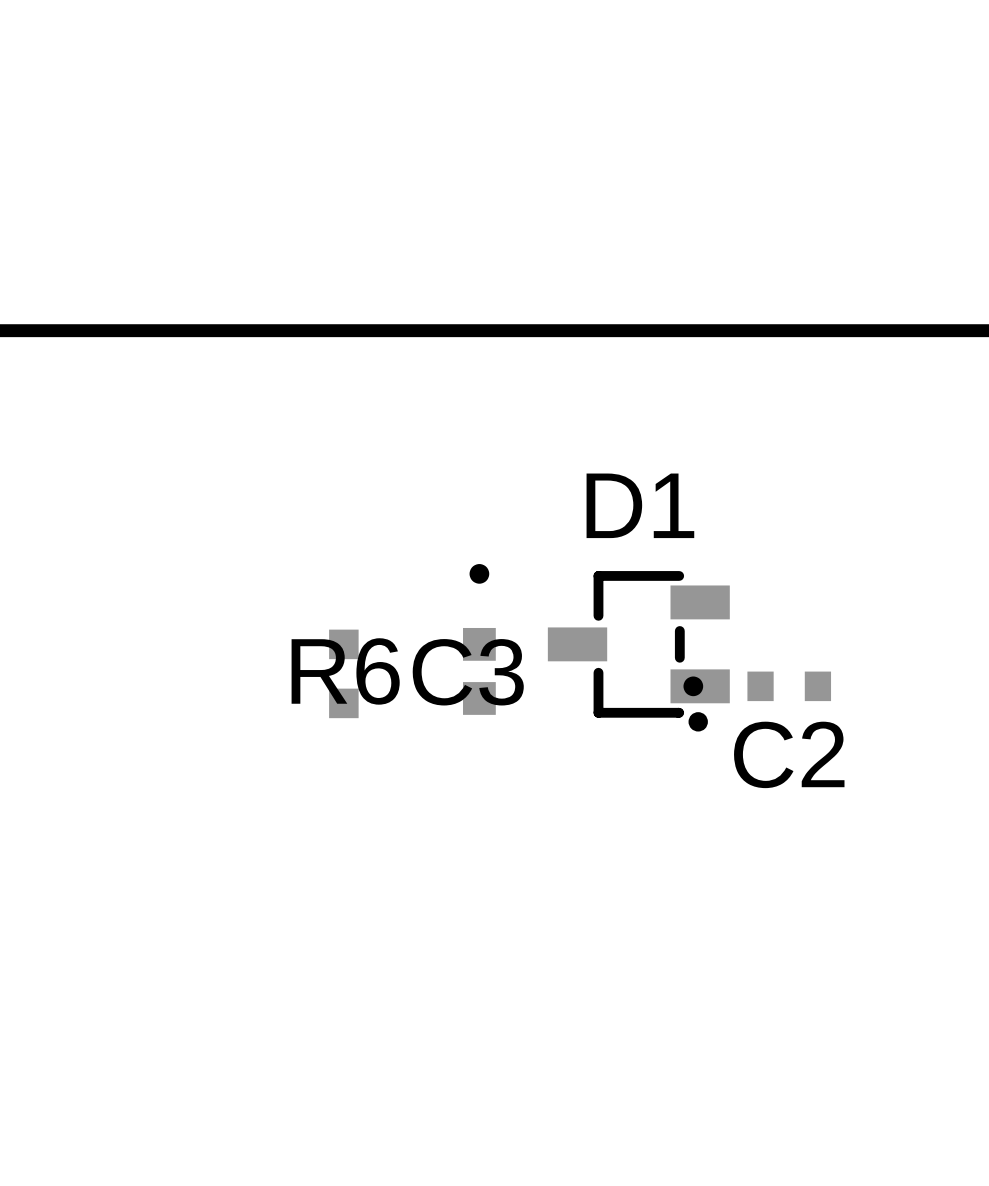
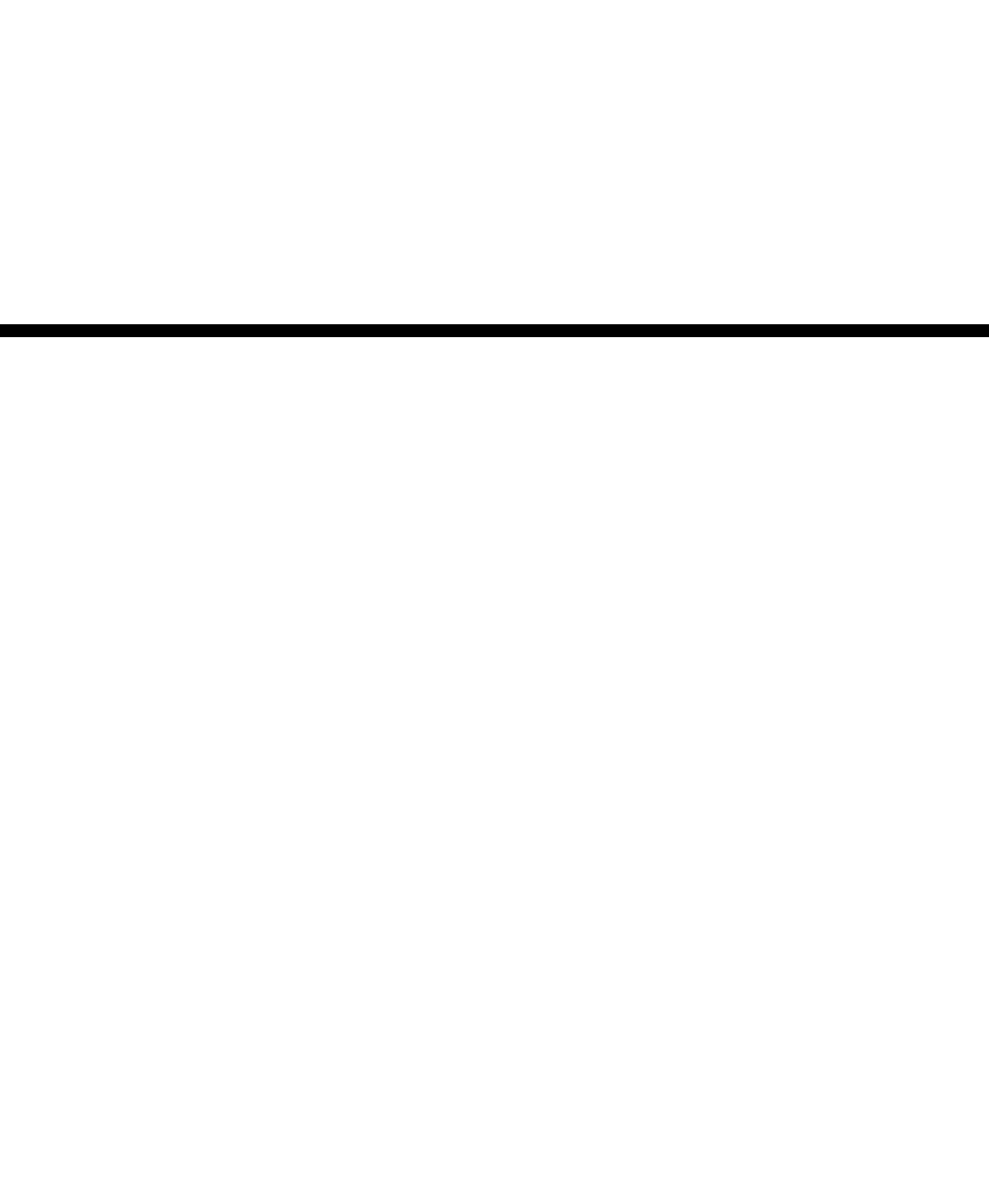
C3: (479, 639) -> none
D1: (638, 651) -> none
R6: (343, 673) -> none
C2: (757, 686) -> none

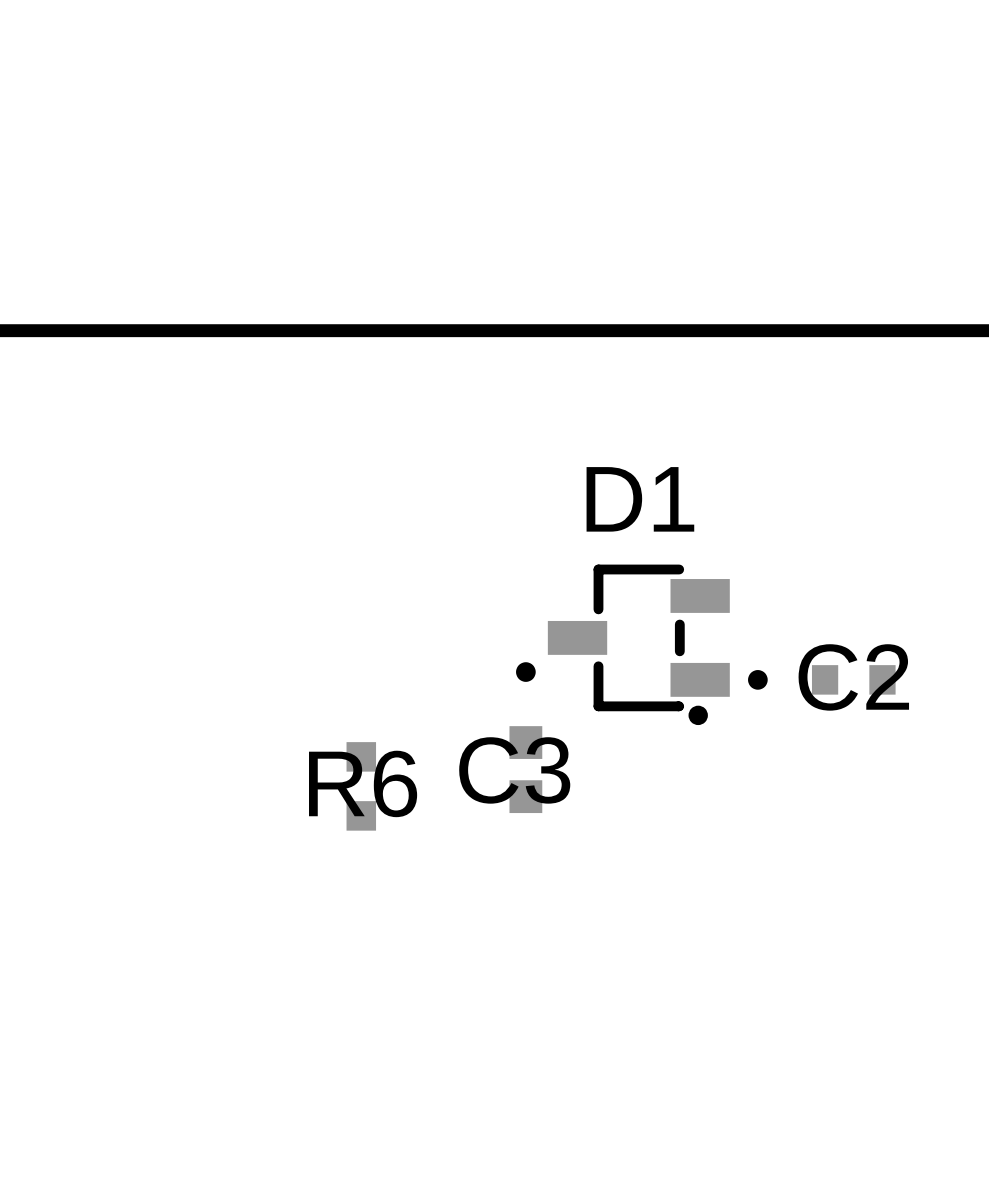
D1: none -> (638, 644)
C2: none -> (821, 679)
C3: none -> (525, 737)
R6: none -> (361, 786)

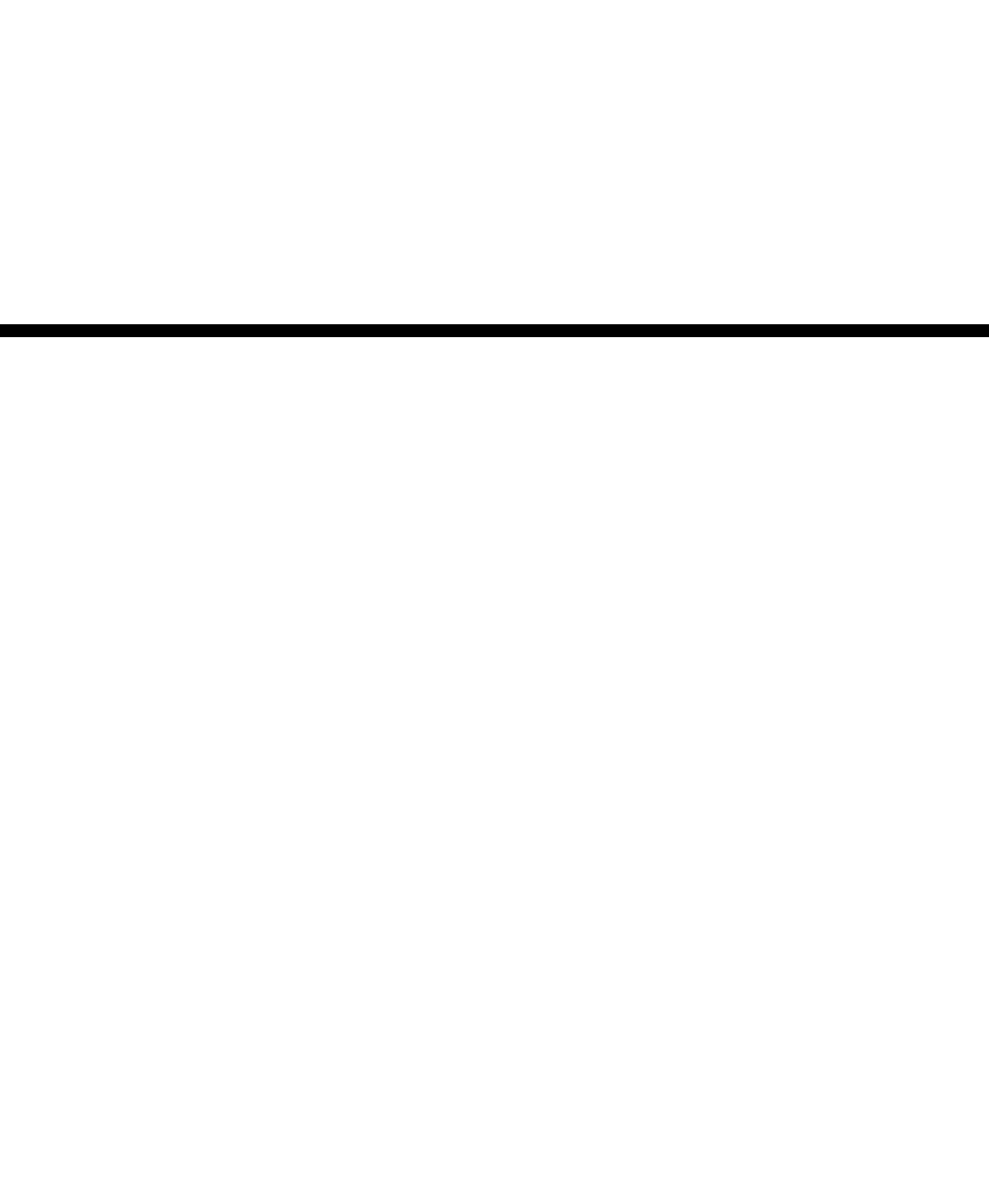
D1: (638, 644) -> none
C2: (821, 679) -> none
C3: (525, 737) -> none
R6: (361, 786) -> none

